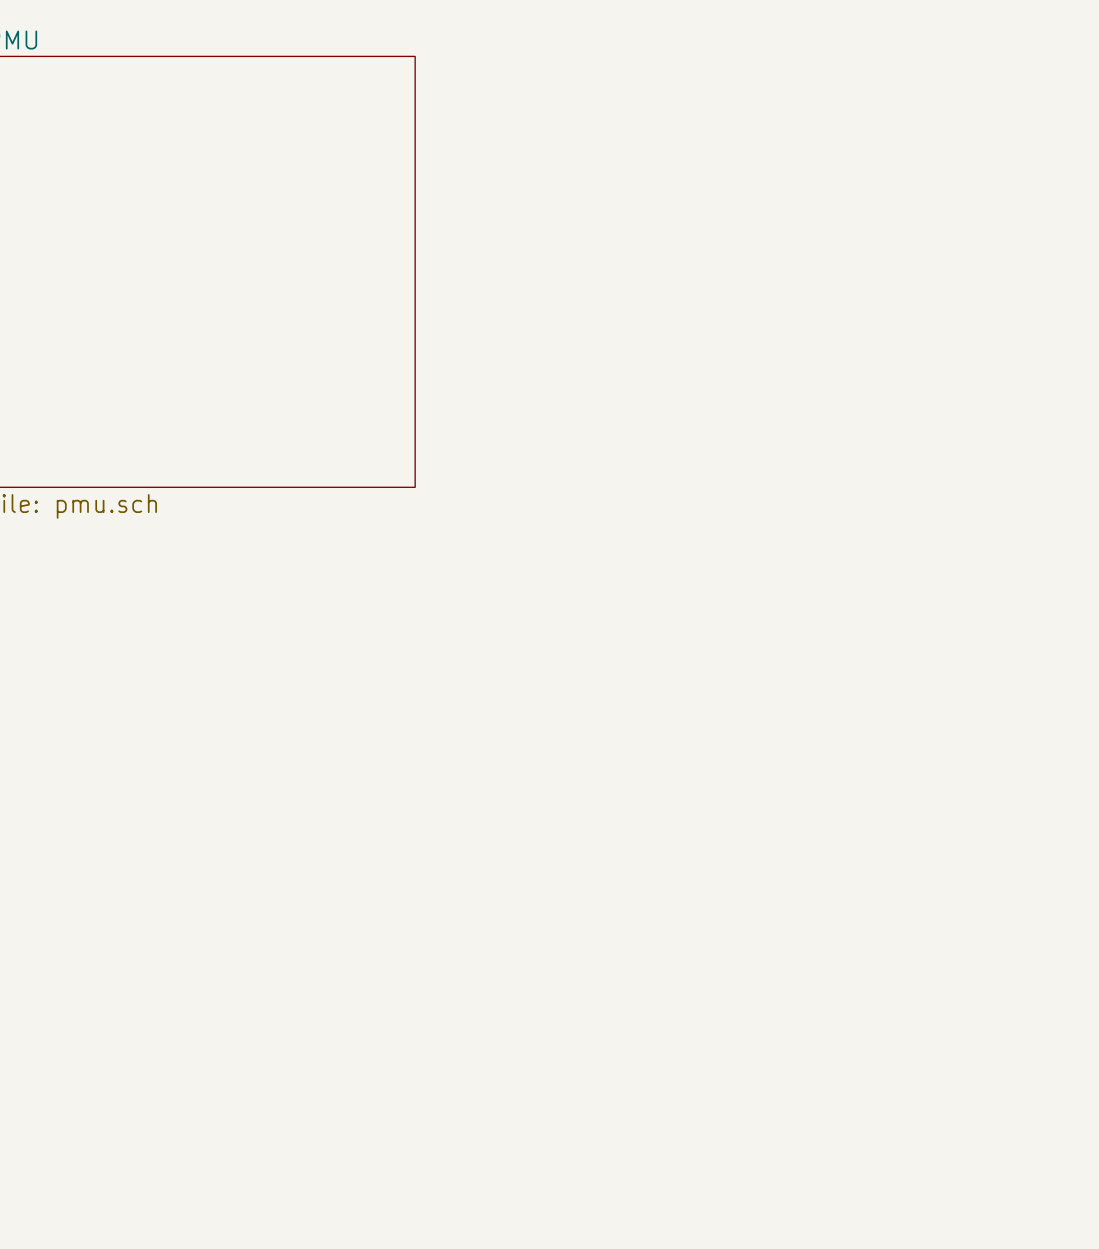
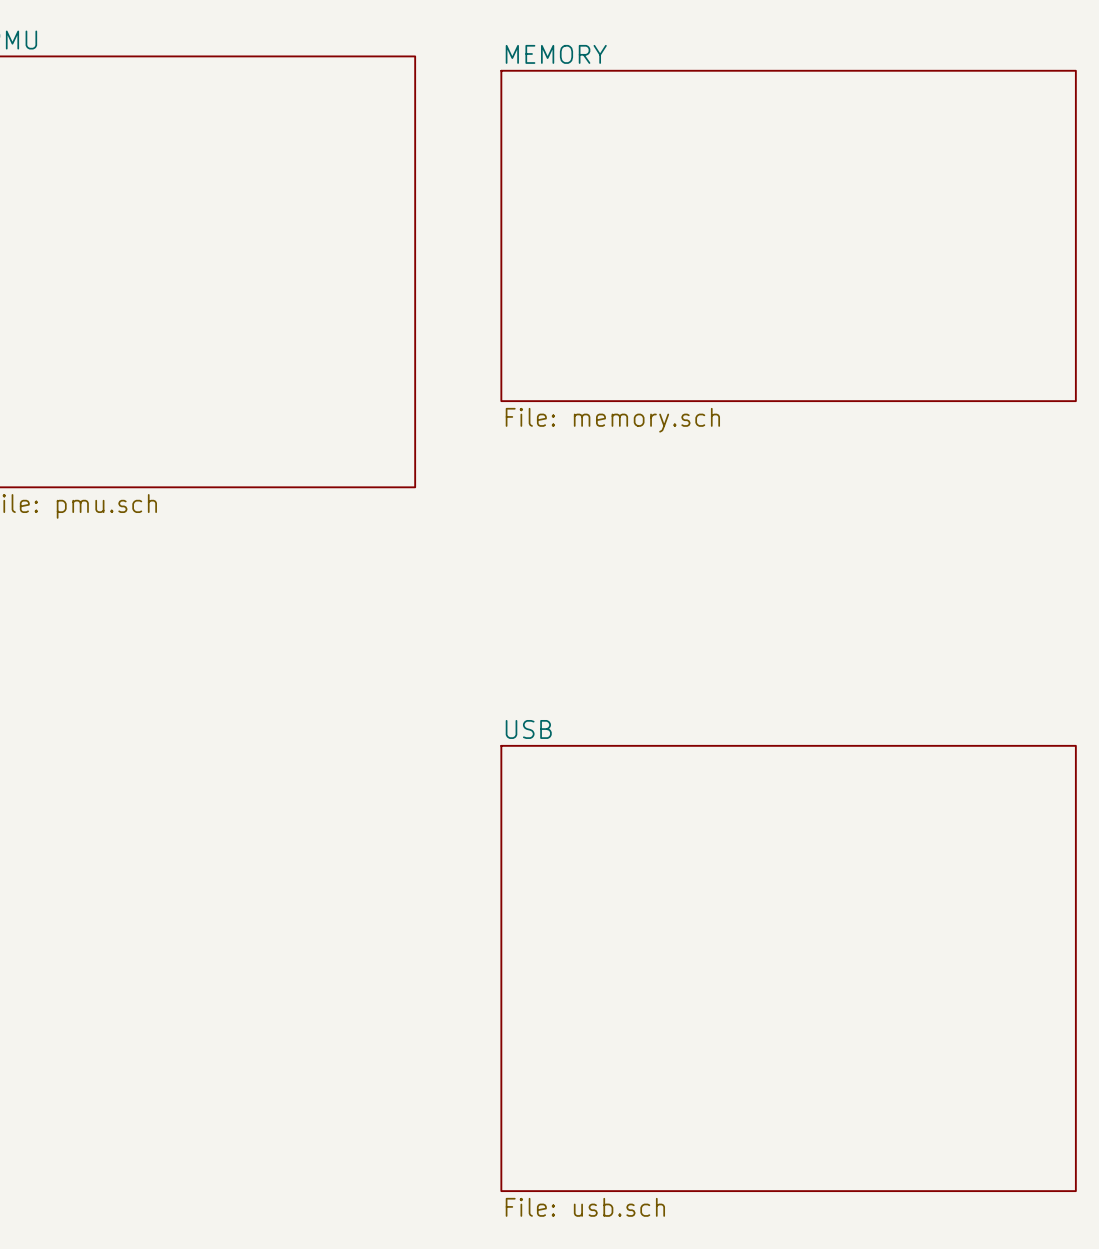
sheet MEMORY: none -> File: memory.sch (788, 235)
sheet USB: none -> File: usb.sch (788, 968)

